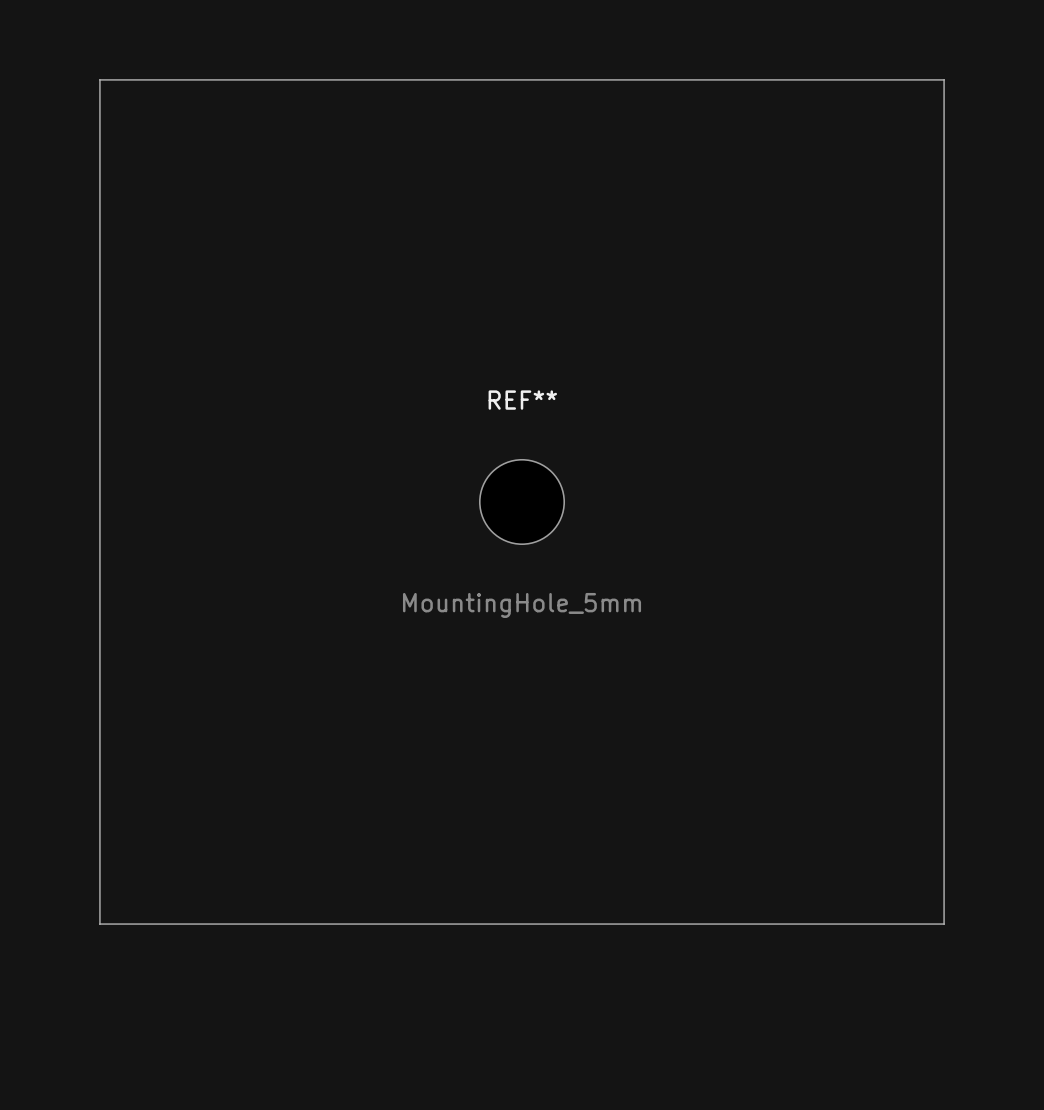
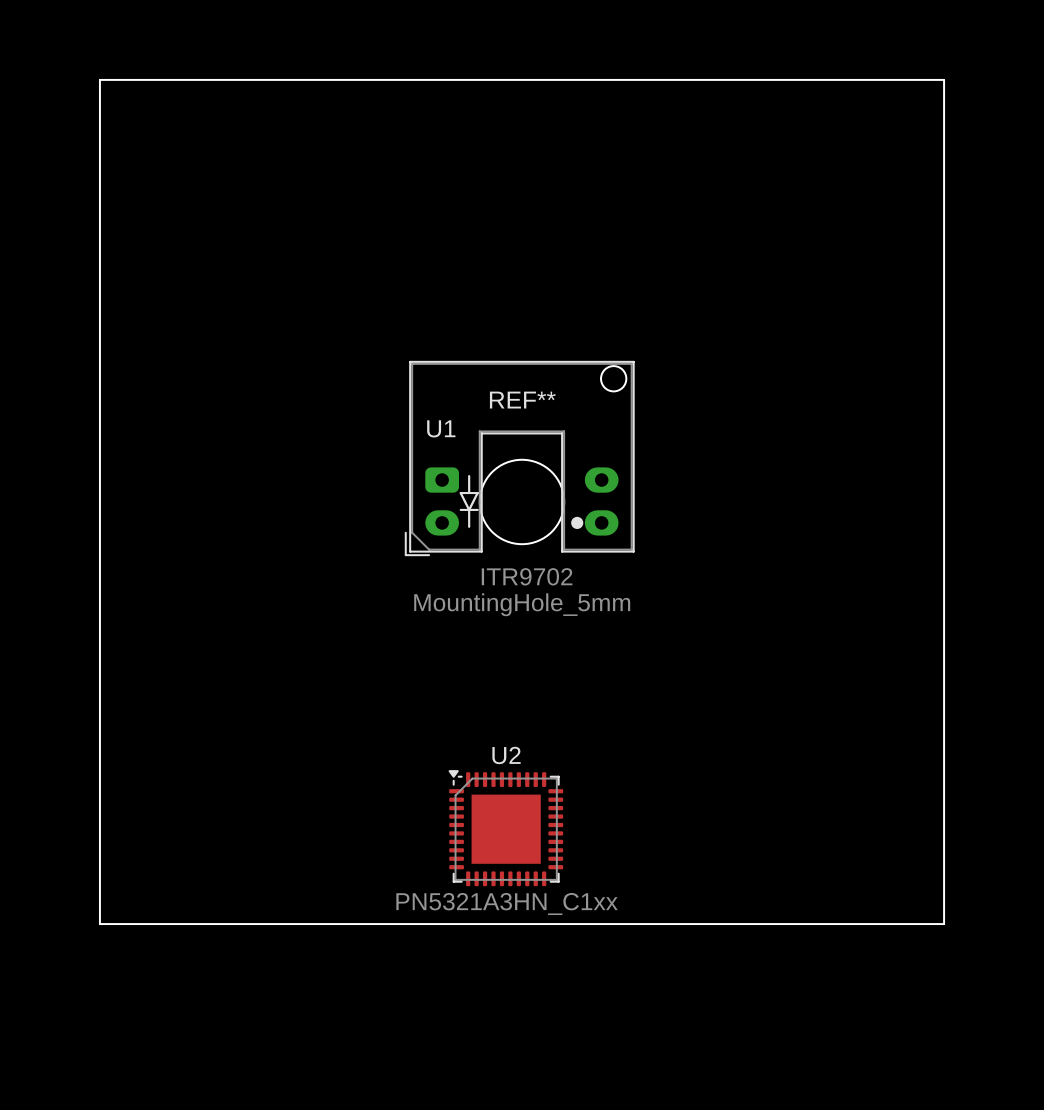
U1: none -> ITR9702 (519, 458)
U2: none -> PN5321A3HN_C1xx (505, 828)

